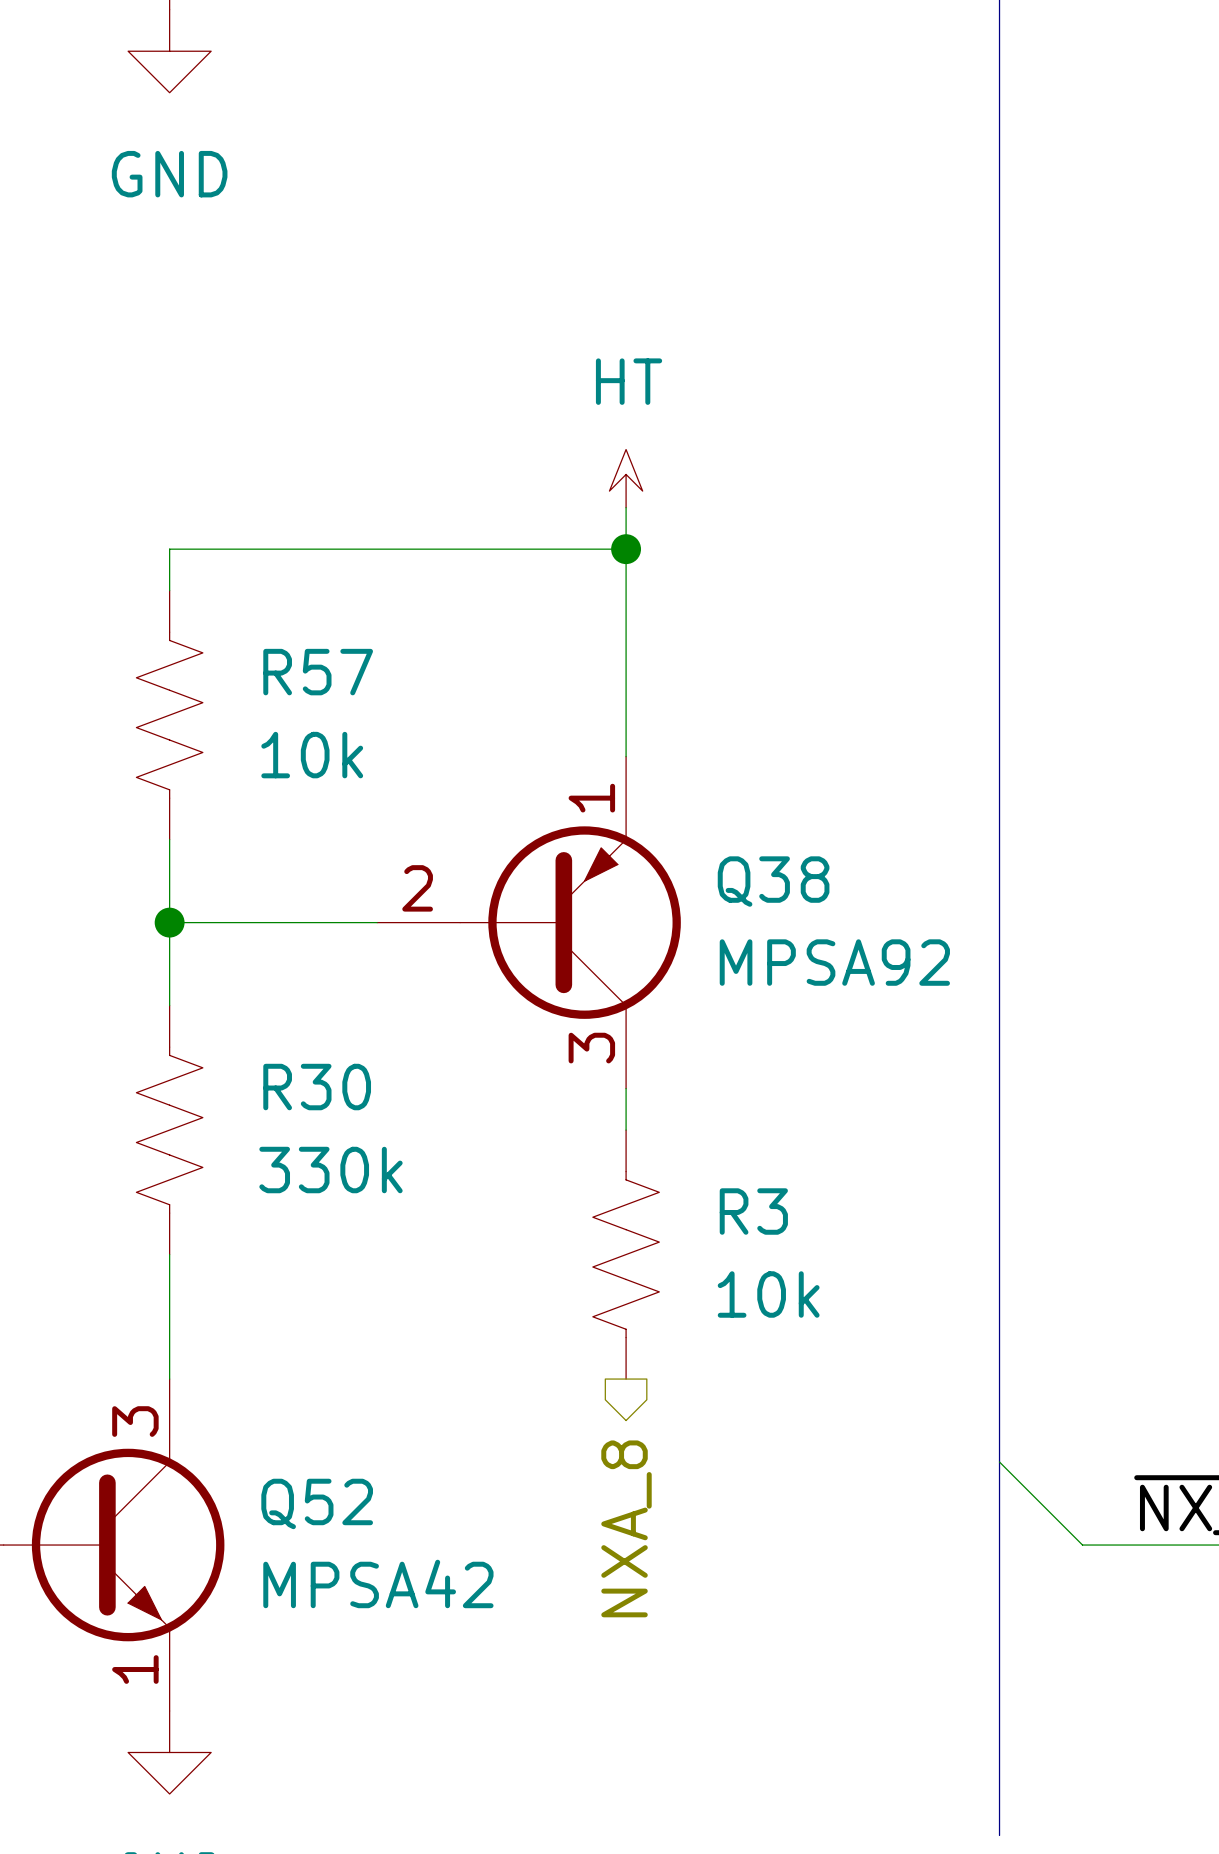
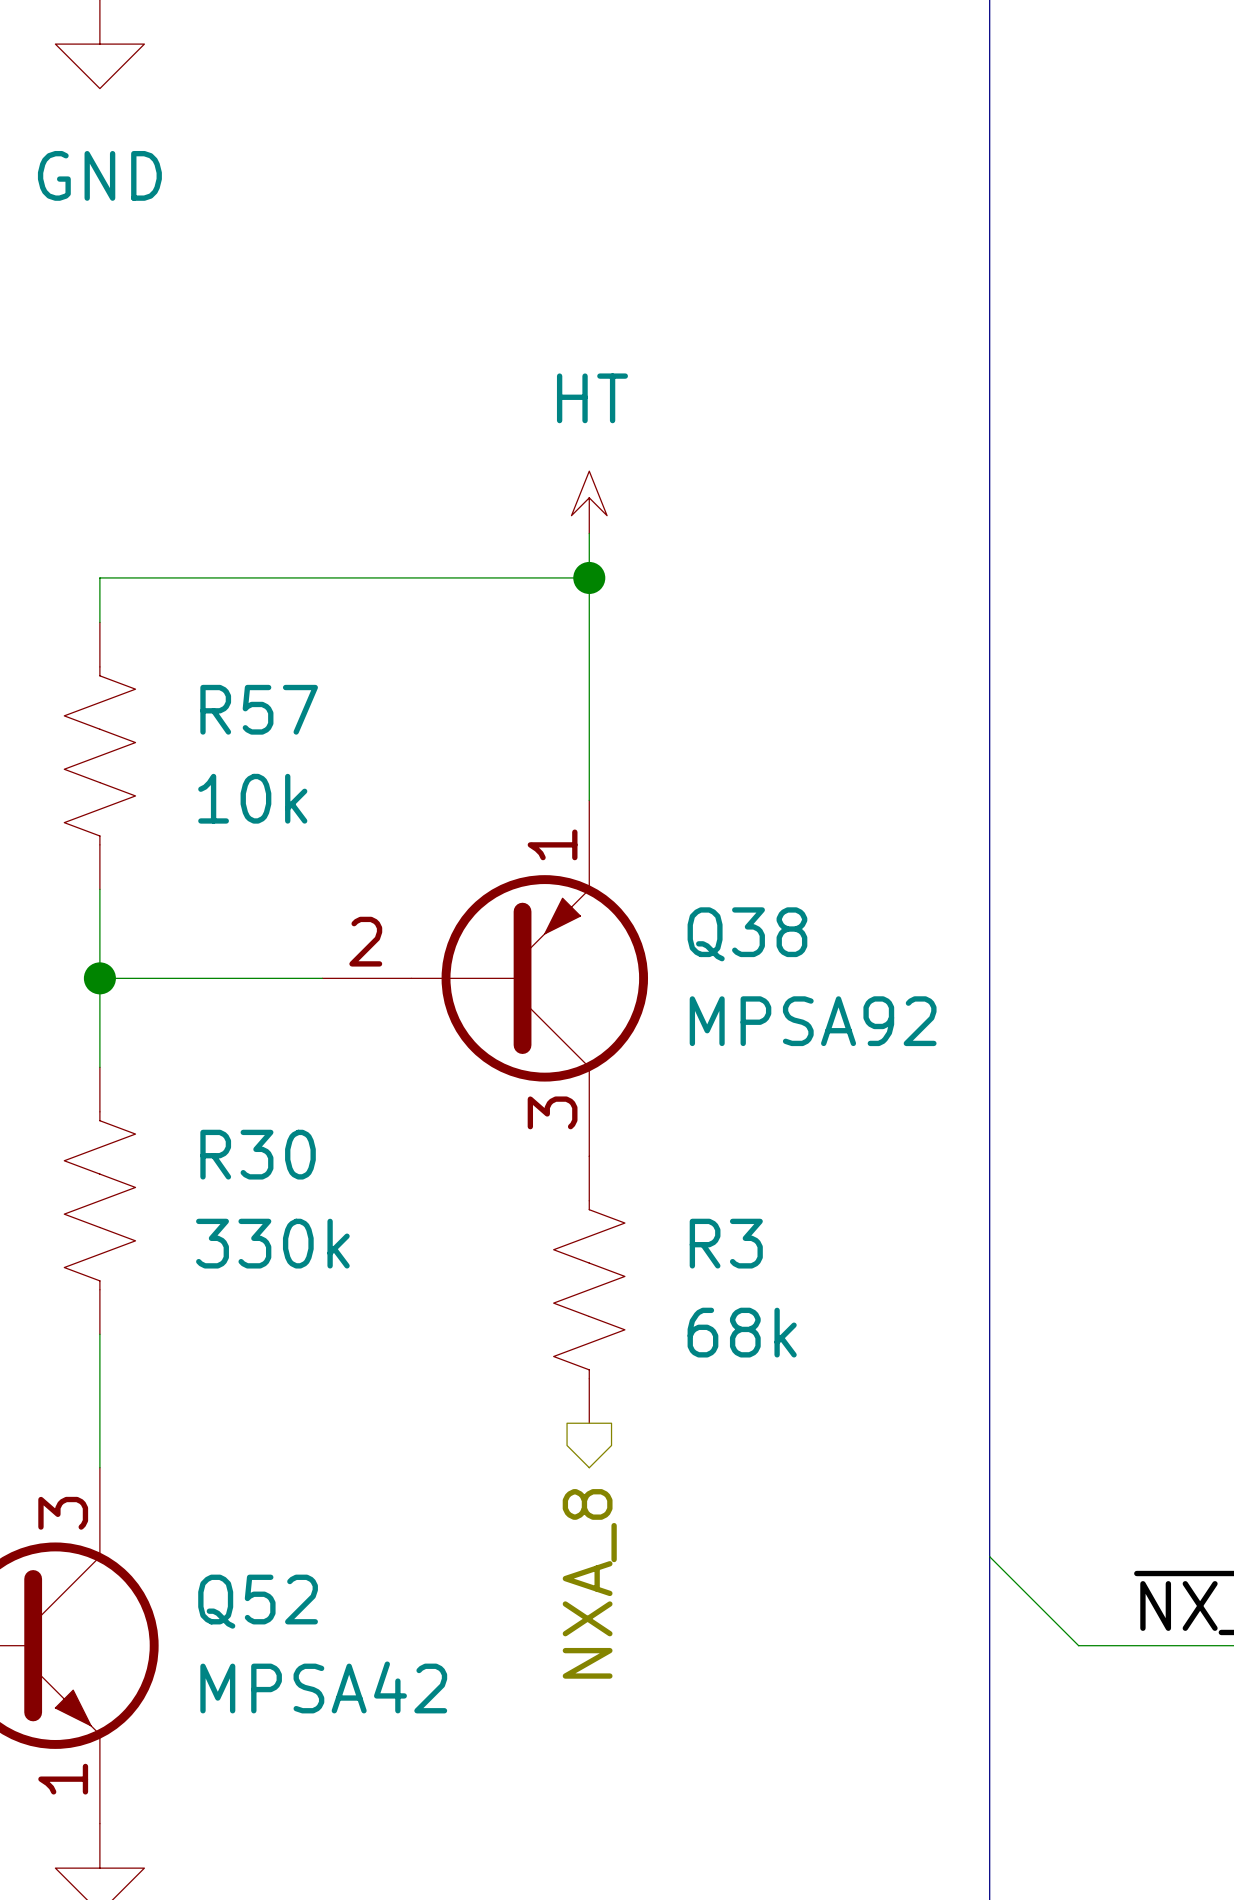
R3 position: (626, 1254) -> (589, 1289)
R3 value: 10k (768, 1294) -> 68k (742, 1332)
hierarchical label position: NXA_8 (626, 1528) -> NXA_8 (589, 1583)

